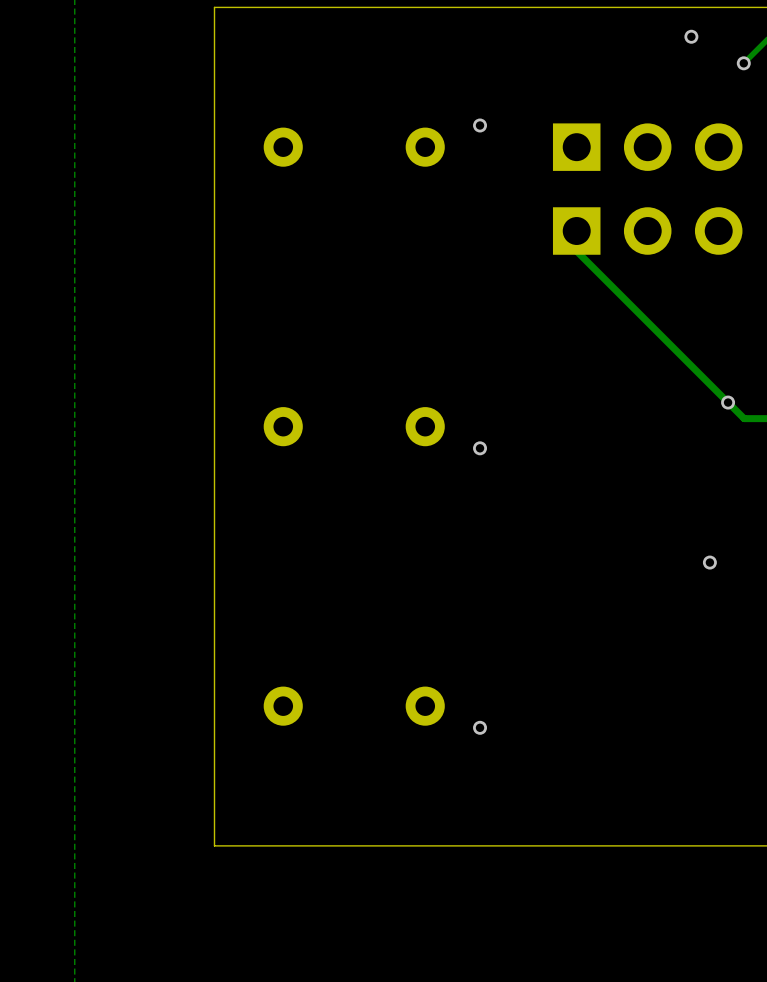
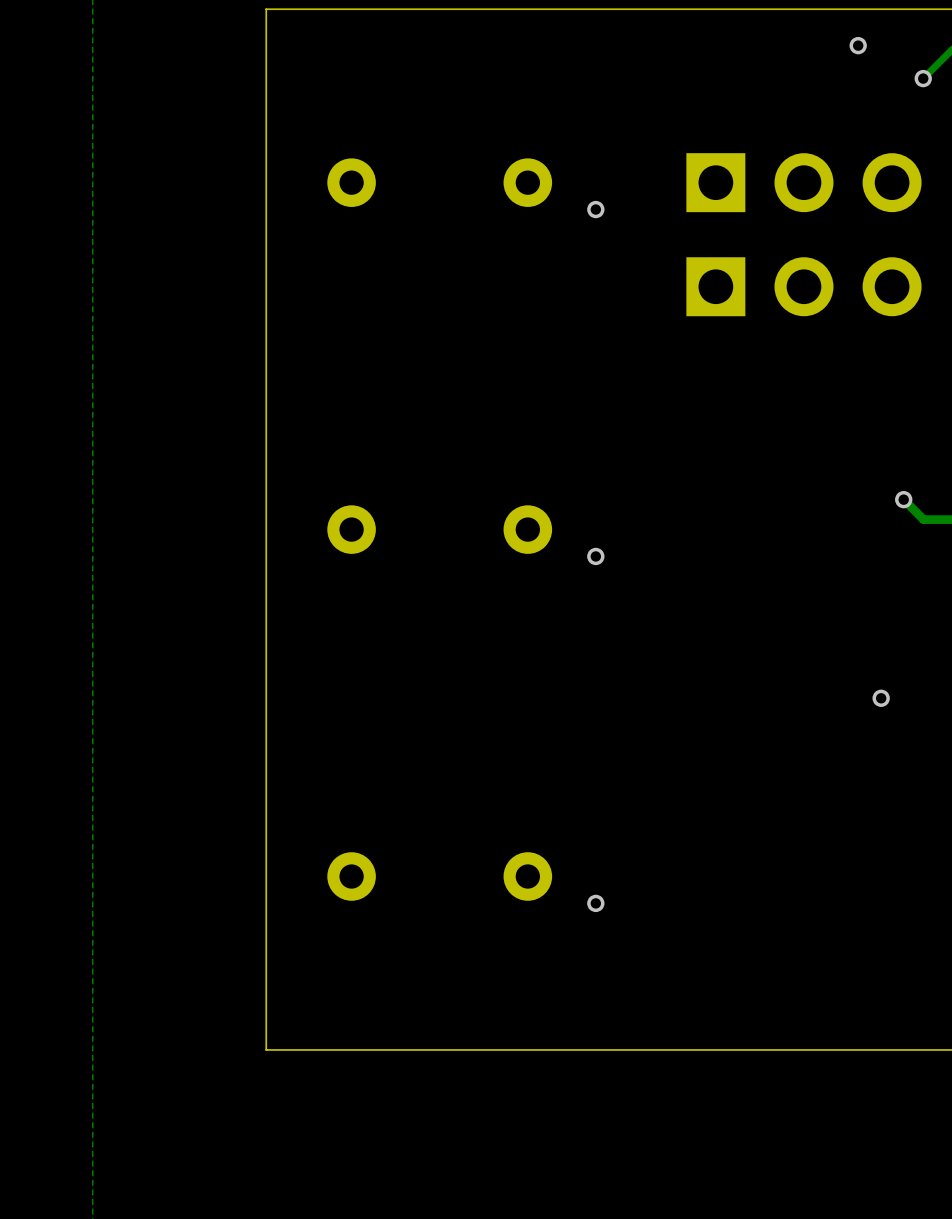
via position: (480, 125) -> (595, 209)
track: (576, 251) (728, 402) -> none

